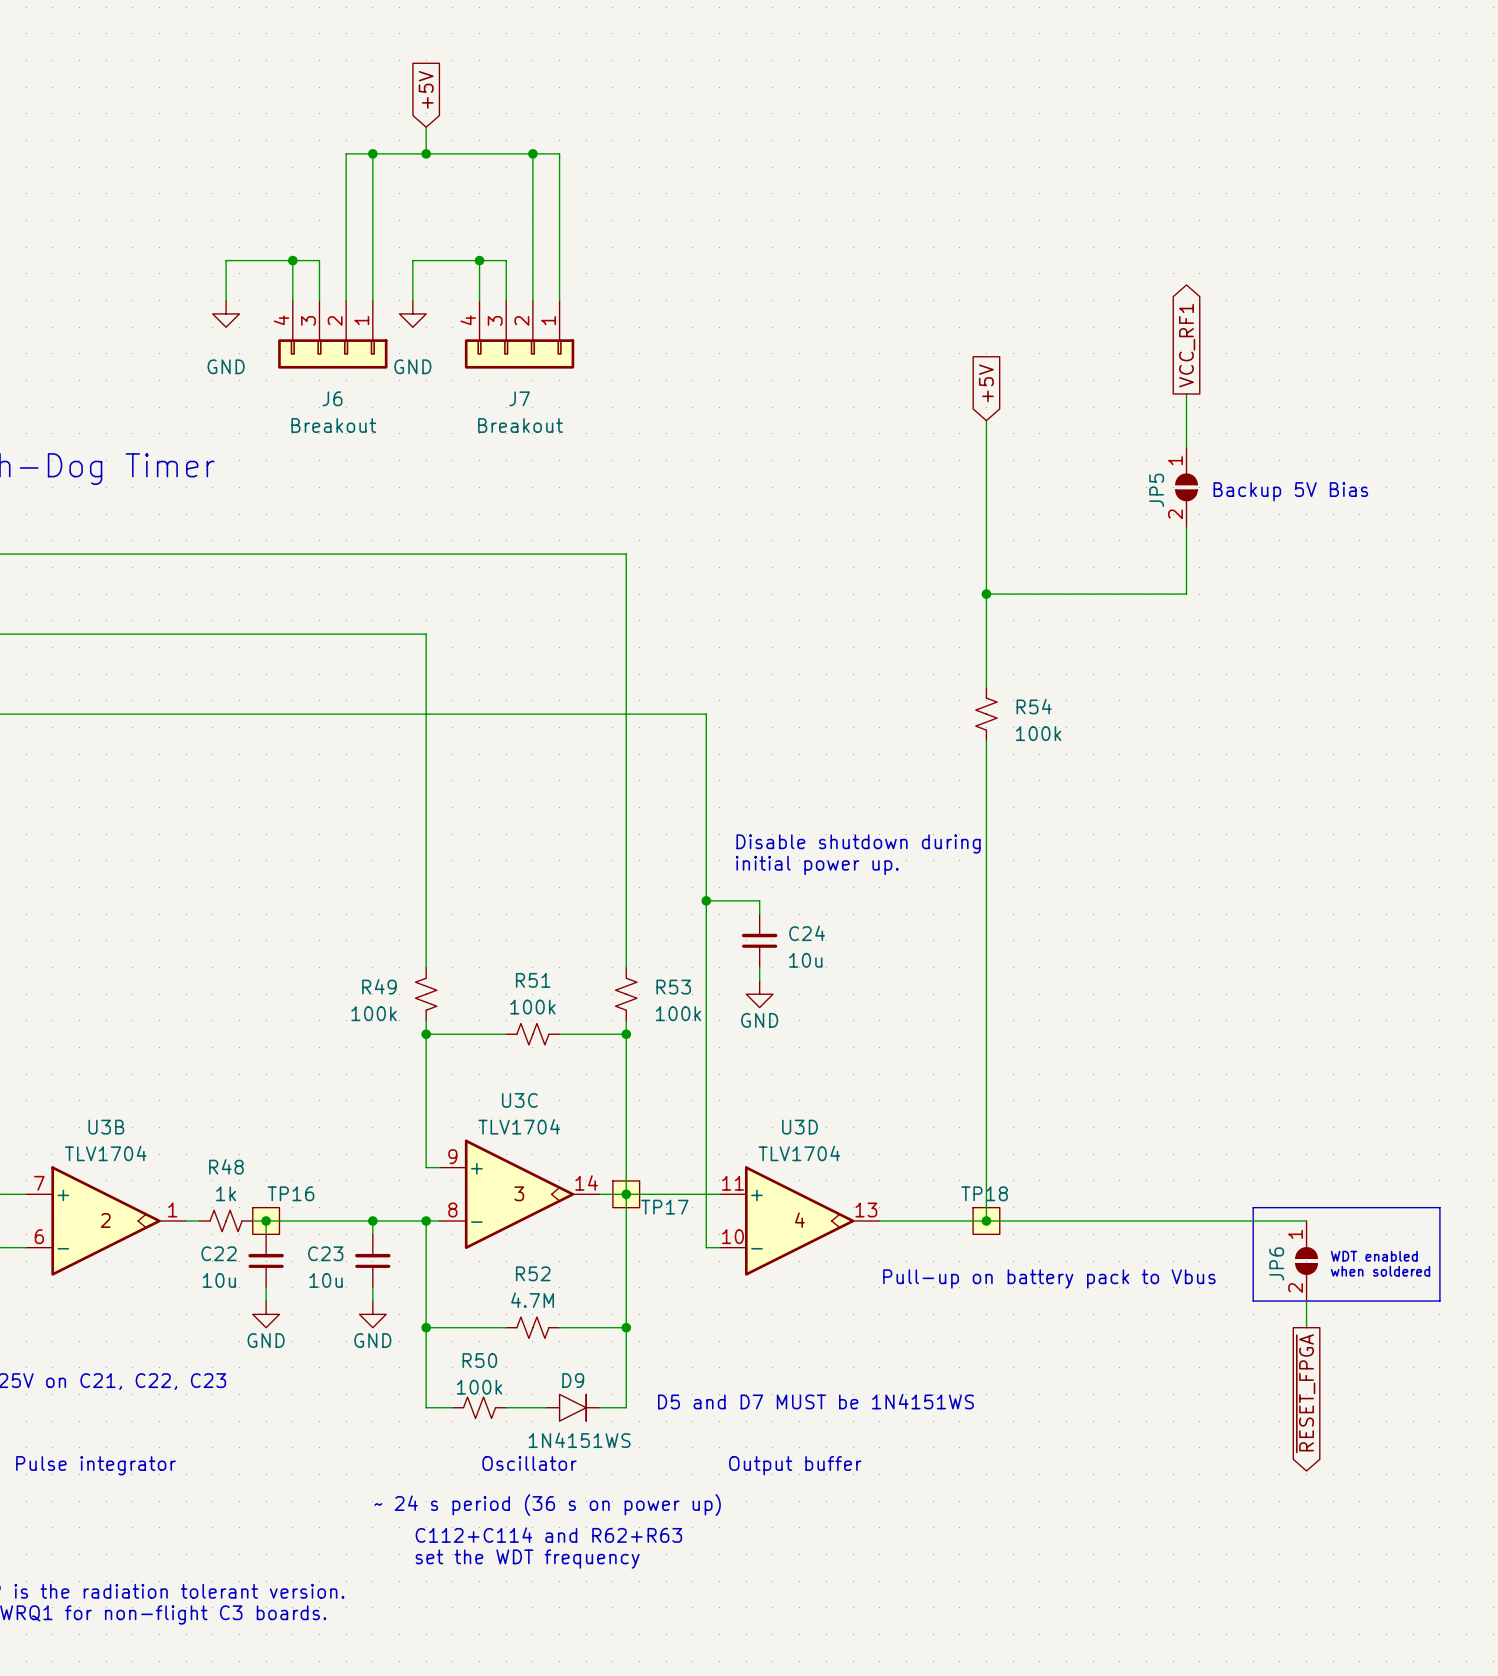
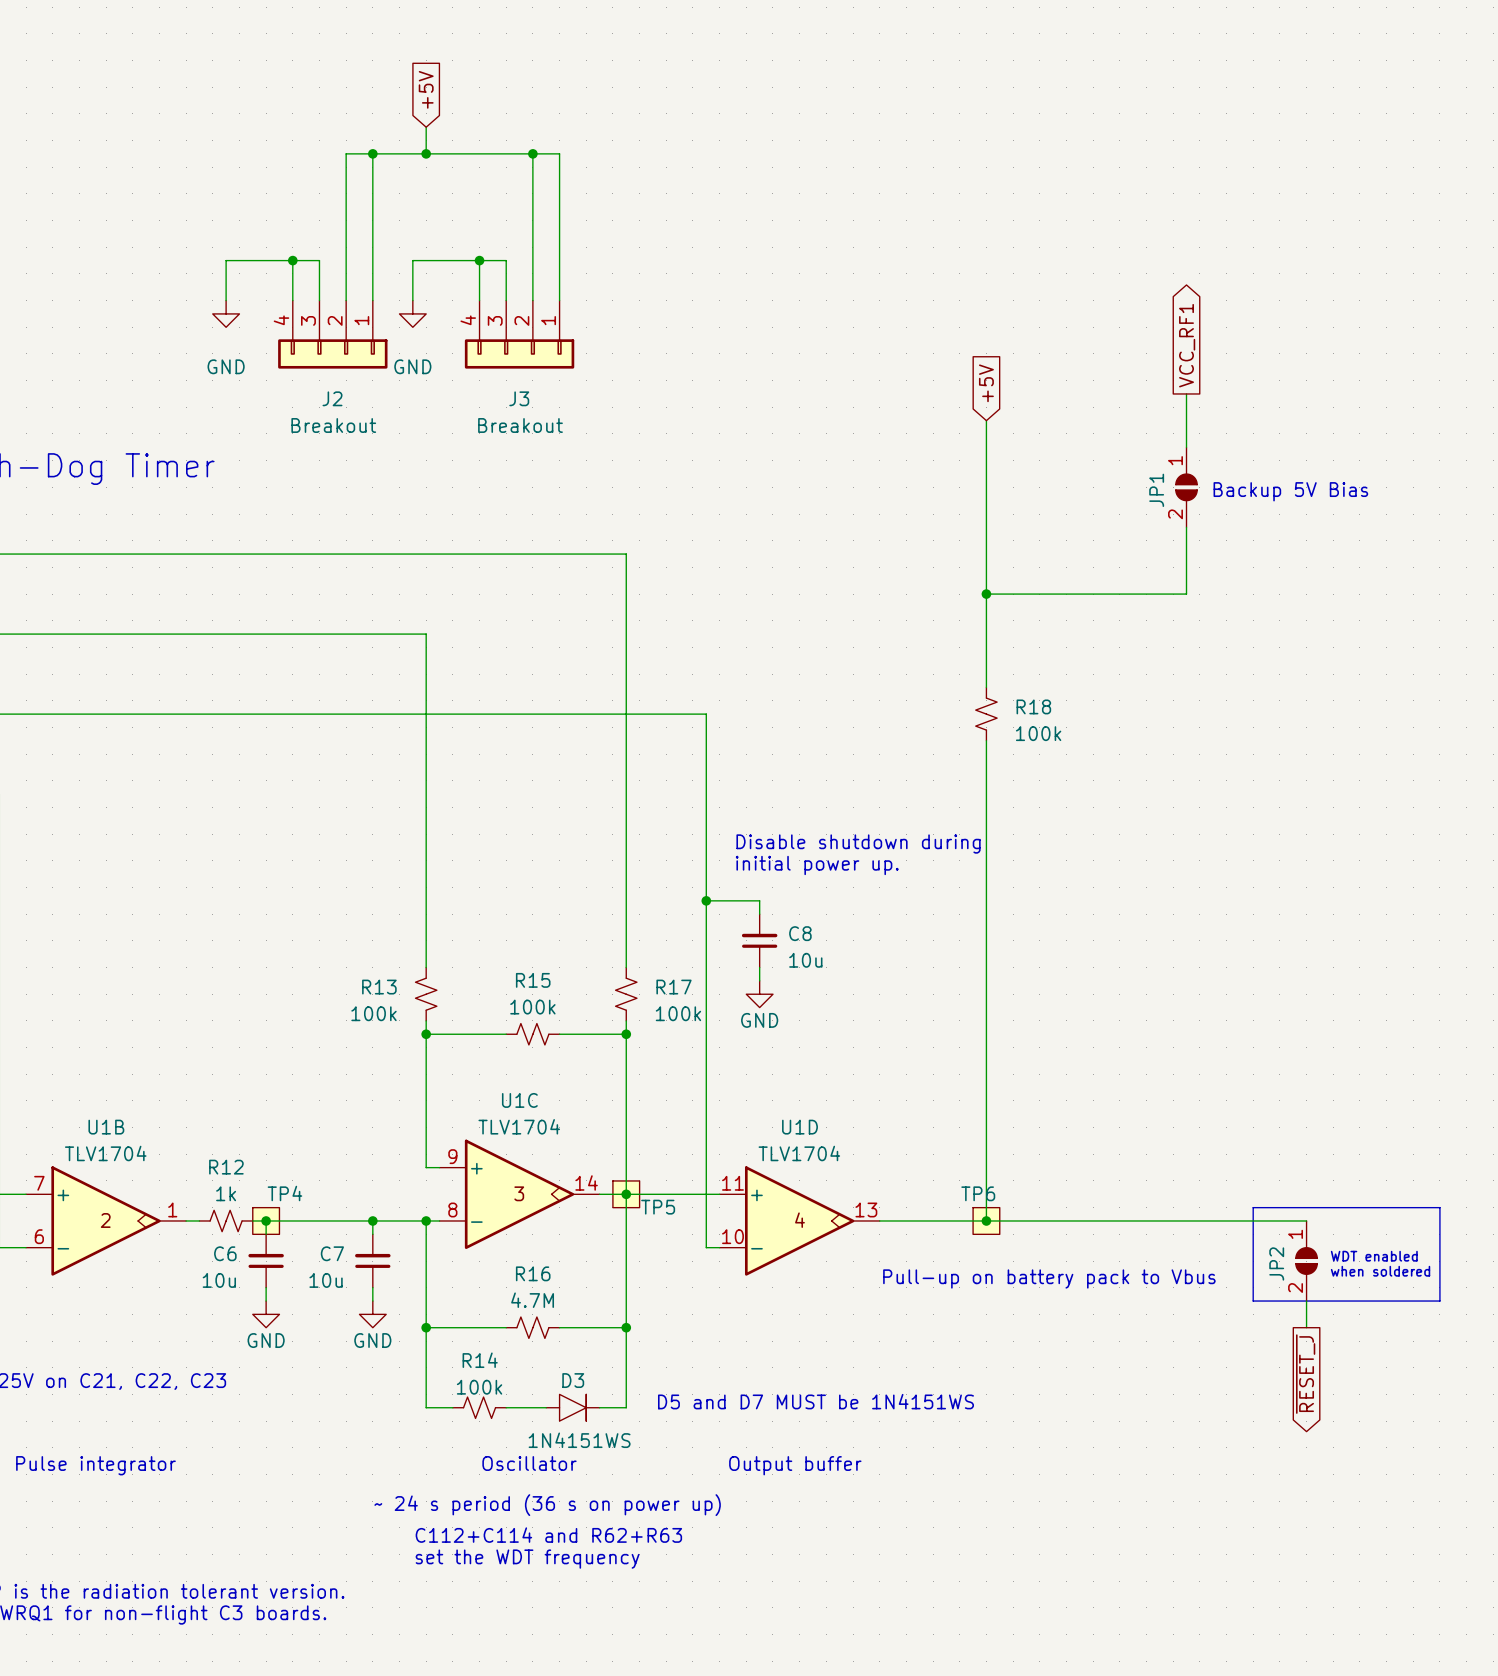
J6 name: J6 (332, 398) -> J2 (332, 398)
J7 name: J7 (519, 398) -> J3 (519, 398)
JP5 name: JP5 (1156, 490) -> JP1 (1156, 490)
R54 name: R54 (1034, 706) -> R18 (1033, 706)
C24 name: C24 (807, 933) -> C8 (800, 933)
R51 name: R51 (533, 980) -> R15 (533, 980)
R49 name: R49 (379, 986) -> R13 (379, 987)
R53 name: R53 (673, 987) -> R17 (674, 987)
U3C name: U3C (519, 1100) -> U1C (519, 1100)
U3B name: U3B (106, 1127) -> U1B (106, 1127)
U3D name: U3D (799, 1127) -> U1D (799, 1127)
R48 name: R48 (226, 1166) -> R12 (226, 1167)
TP16 name: TP16 (290, 1193) -> TP4 (284, 1193)
TP18 name: TP18 (984, 1193) -> TP6 (978, 1193)
TP17 name: TP17 (664, 1207) -> TP5 (658, 1207)
C22 name: C22 (219, 1253) -> C6 (225, 1253)
C23 name: C23 (325, 1253) -> C7 (332, 1253)
JP6 name: JP6 (1276, 1263) -> JP2 (1276, 1263)
R52 name: R52 (533, 1273) -> R16 (533, 1273)
R50 name: R50 (479, 1360) -> R14 (480, 1360)
D9 name: D9 (573, 1380) -> D3 (573, 1380)
global label: ~{RESET_FPGA} (1305, 1393) -> ~{RESET_J} (1305, 1374)

